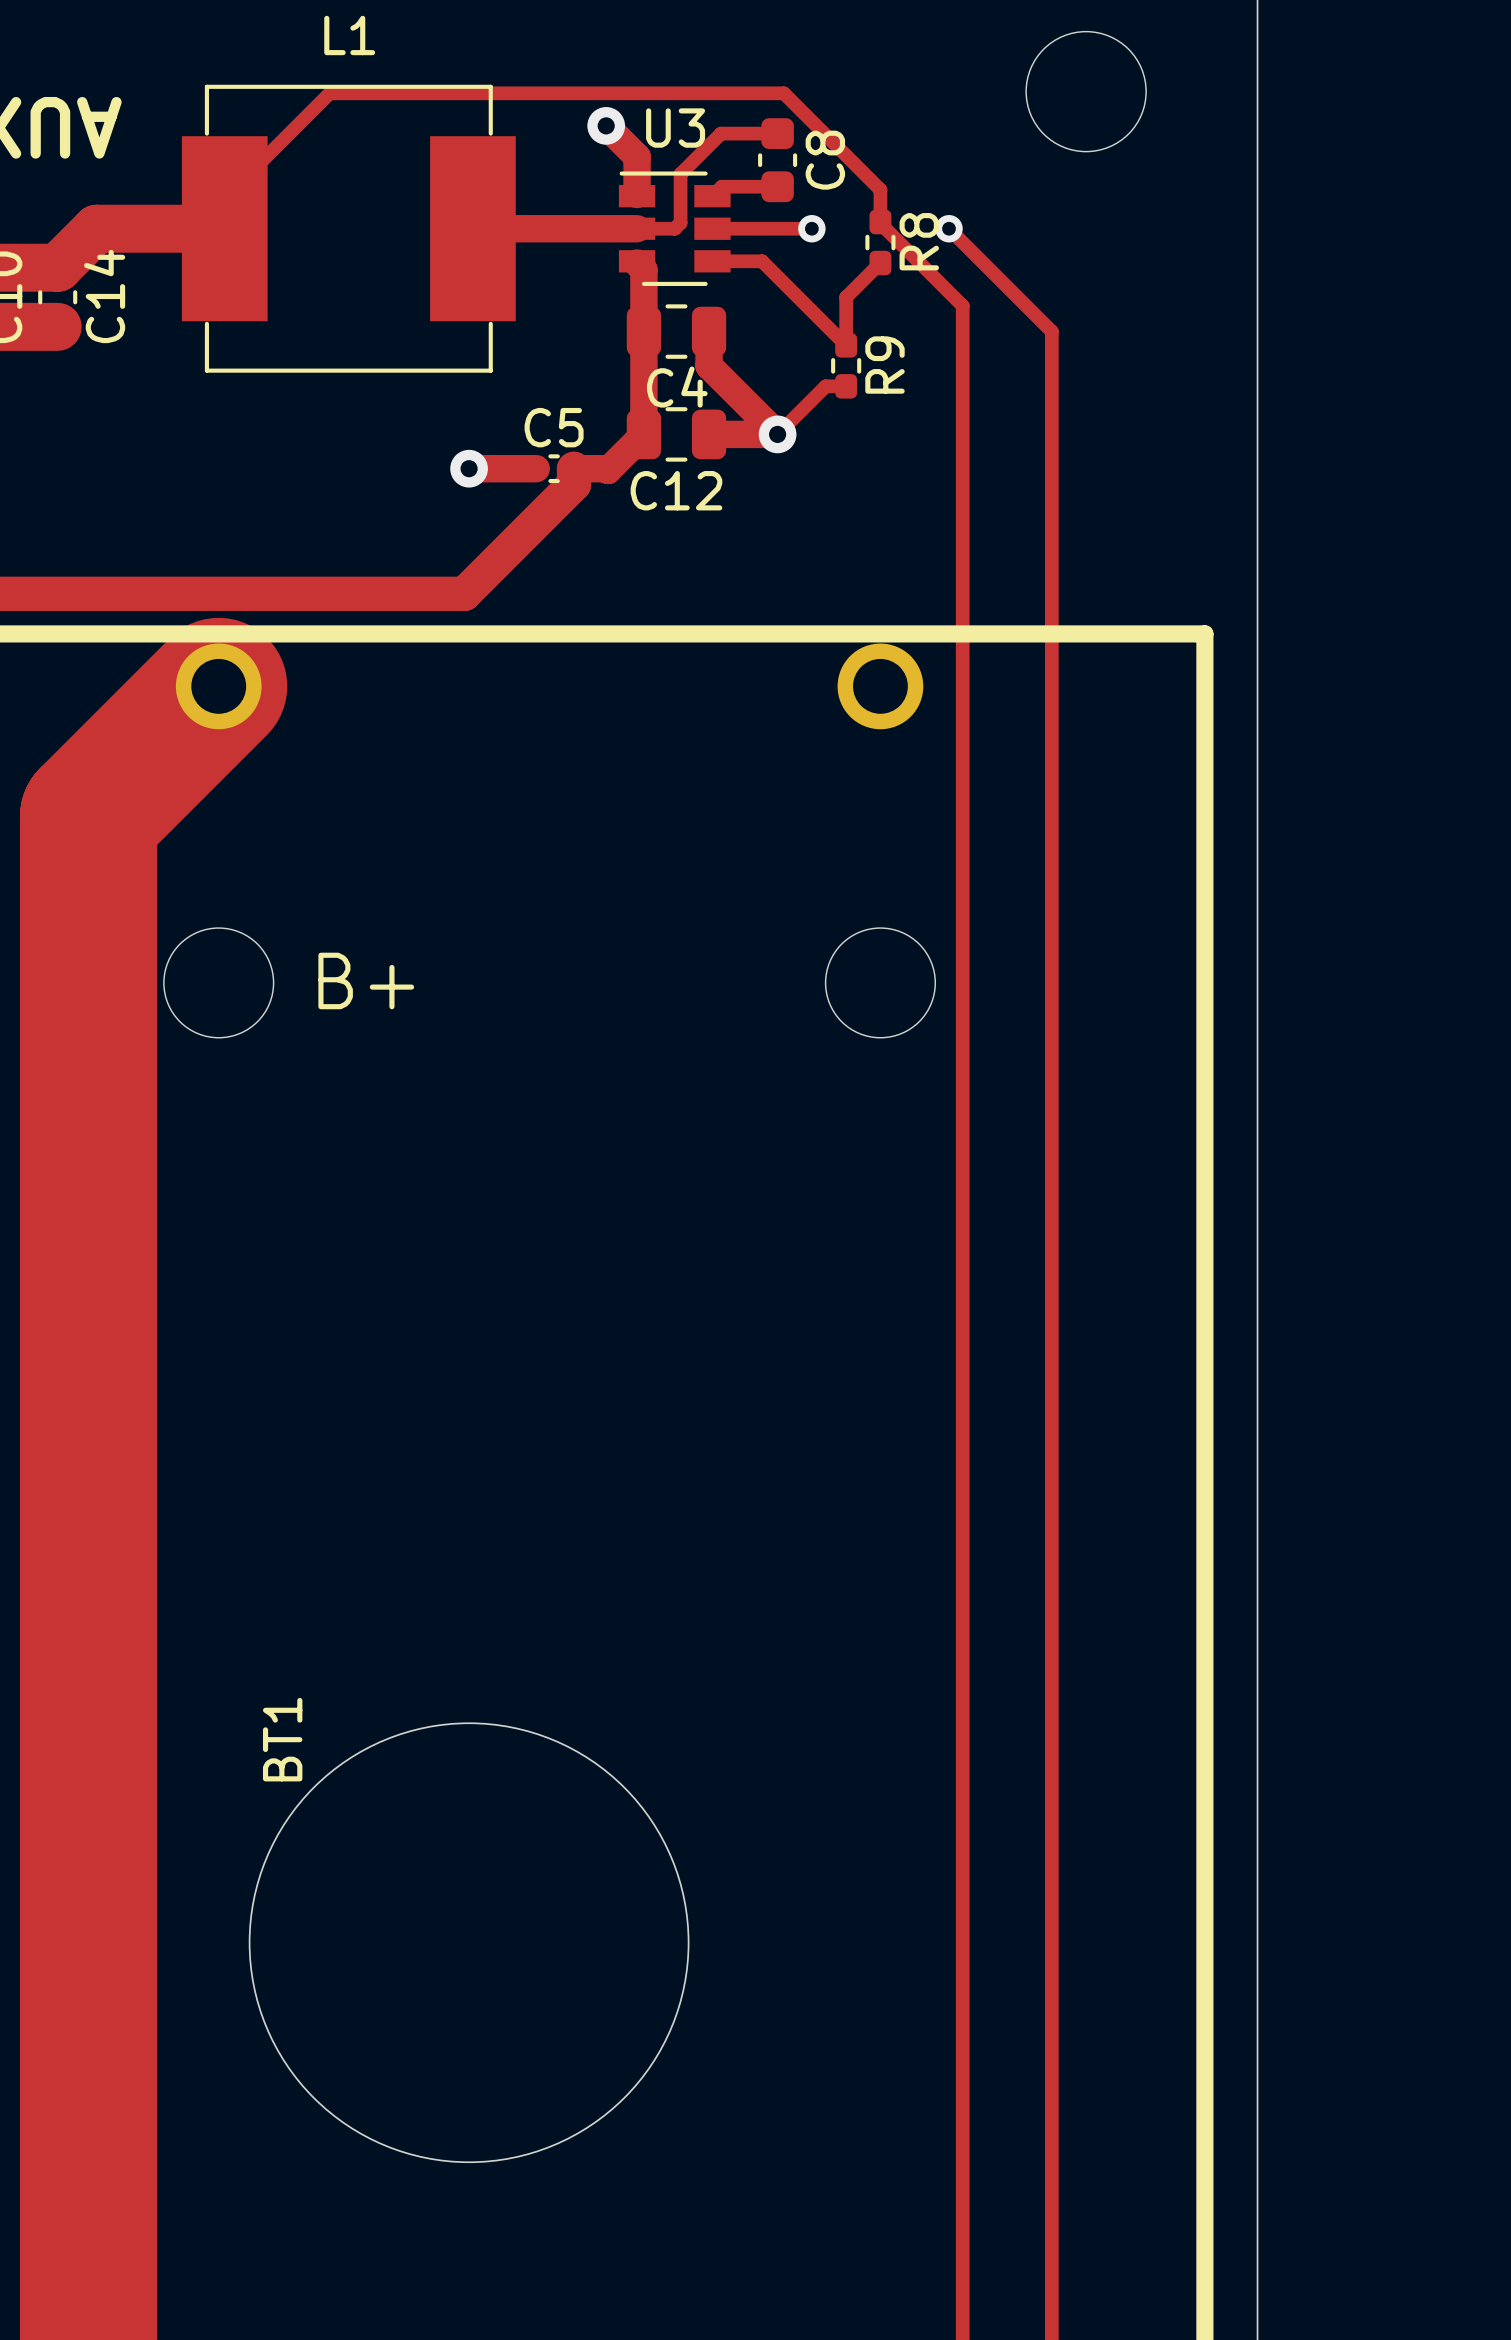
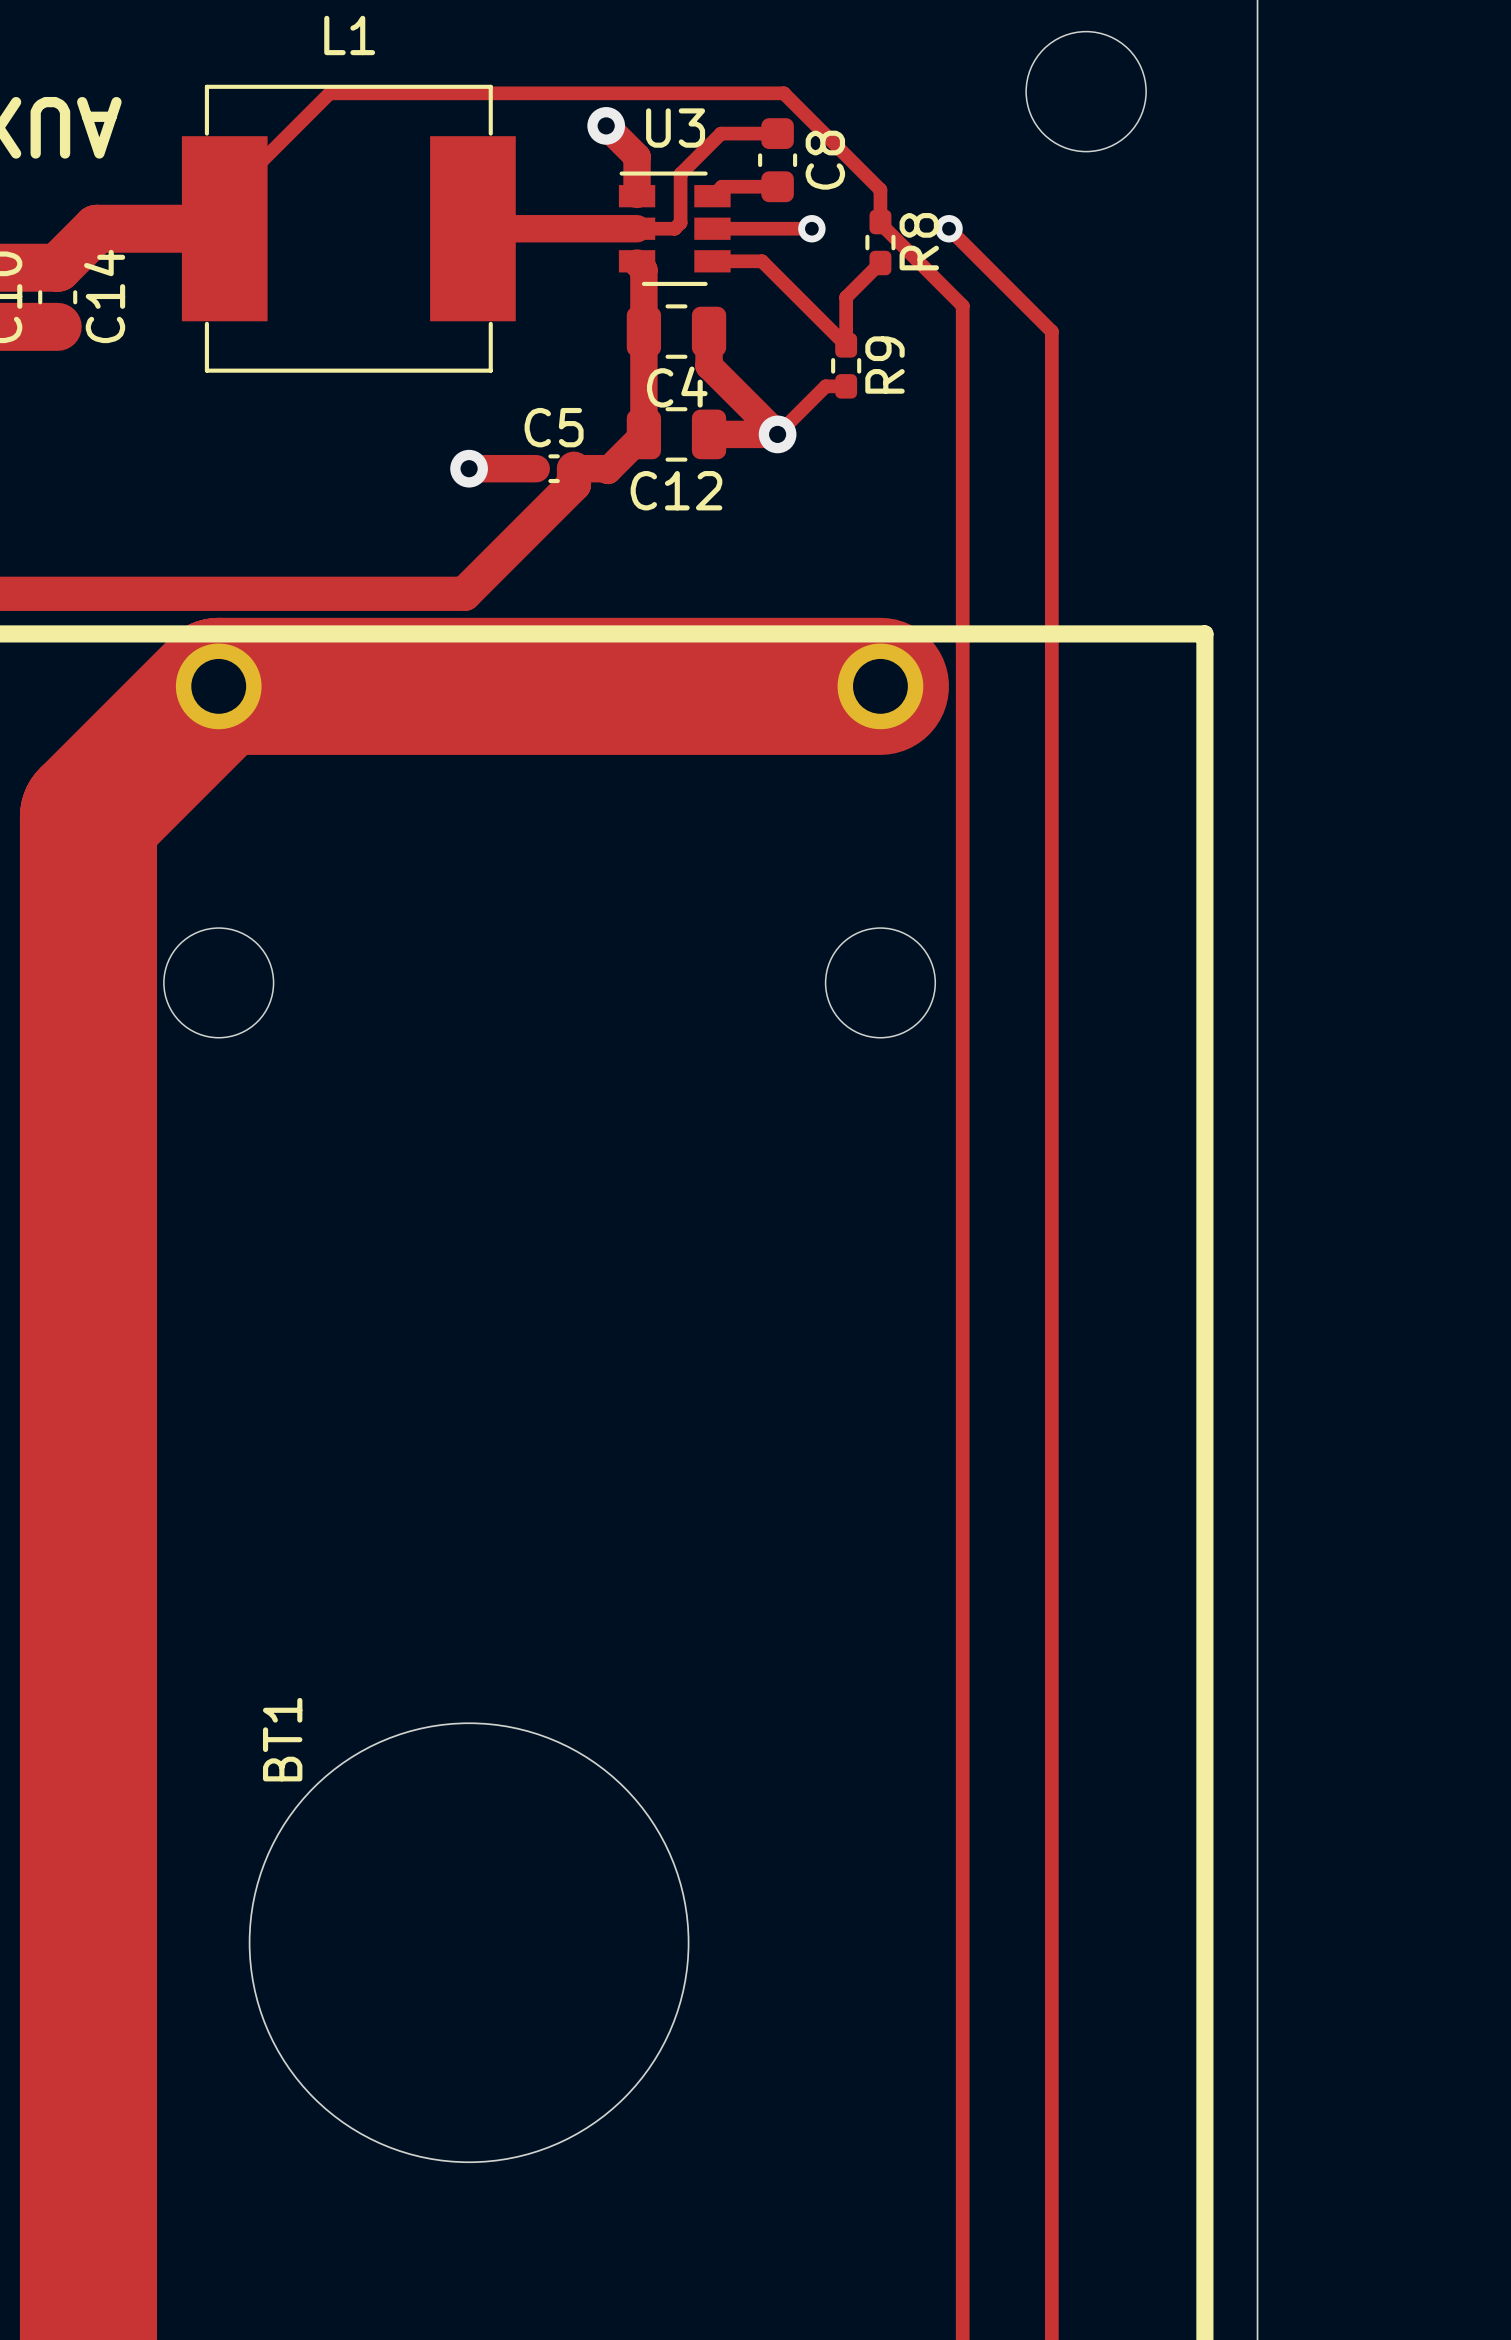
track: none -> (218, 686) (880, 686)
text: B+ (366, 980) -> none

